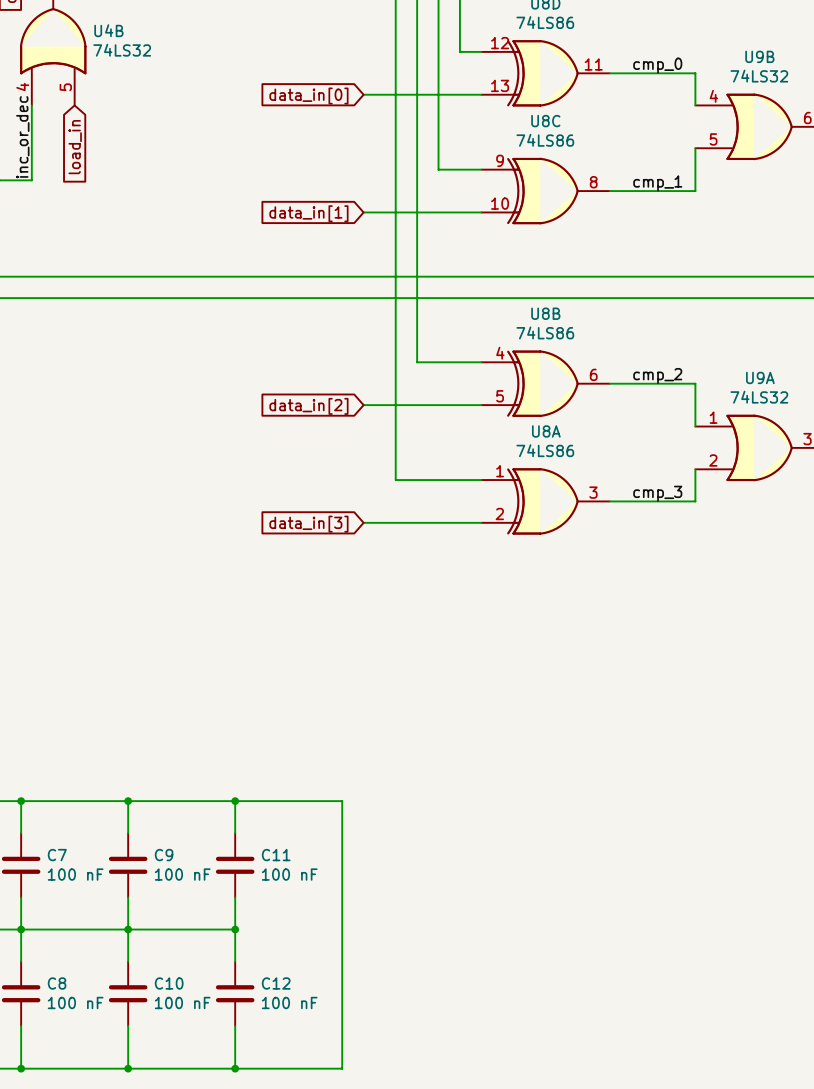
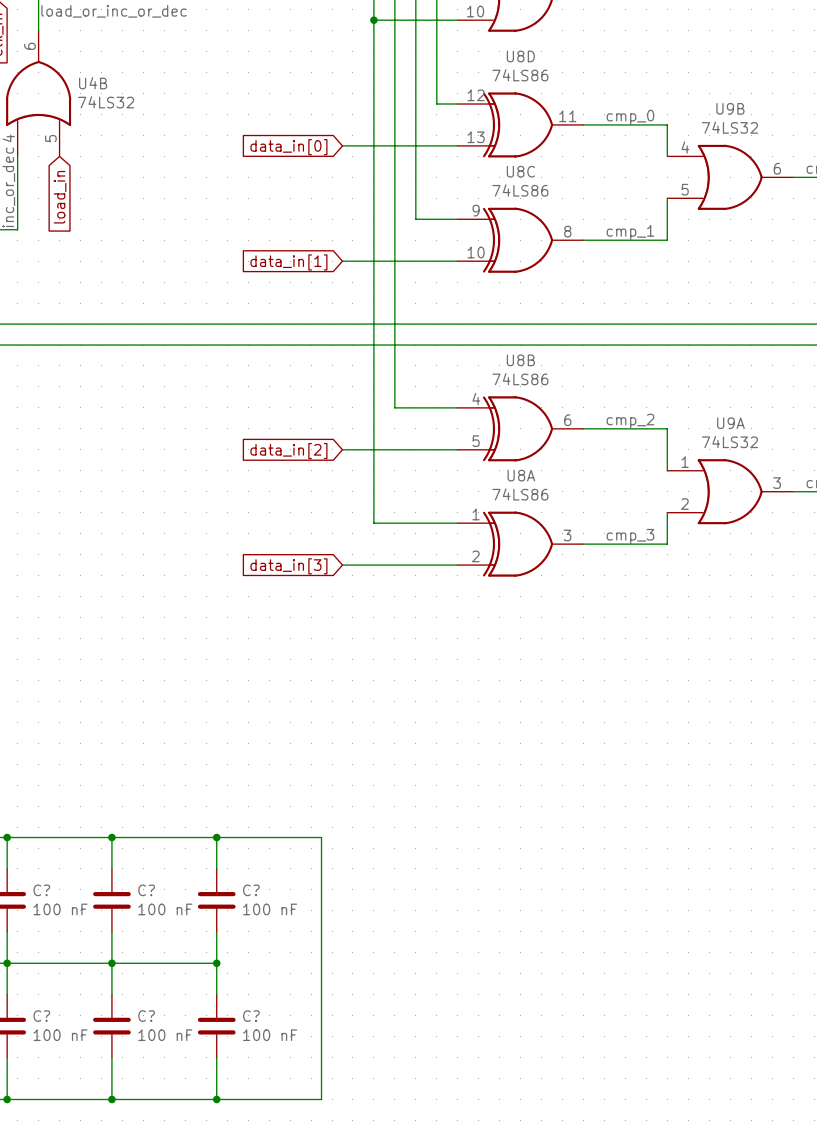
C7 name: C7 (57, 855) -> C? (41, 890)
C9 name: C9 (164, 855) -> C? (146, 890)
C11 name: C11 (276, 855) -> C? (251, 890)
C8 name: C8 (57, 983) -> C? (41, 1016)
C10 name: C10 (169, 983) -> C? (146, 1016)
C12 name: C12 (276, 983) -> C? (251, 1016)

